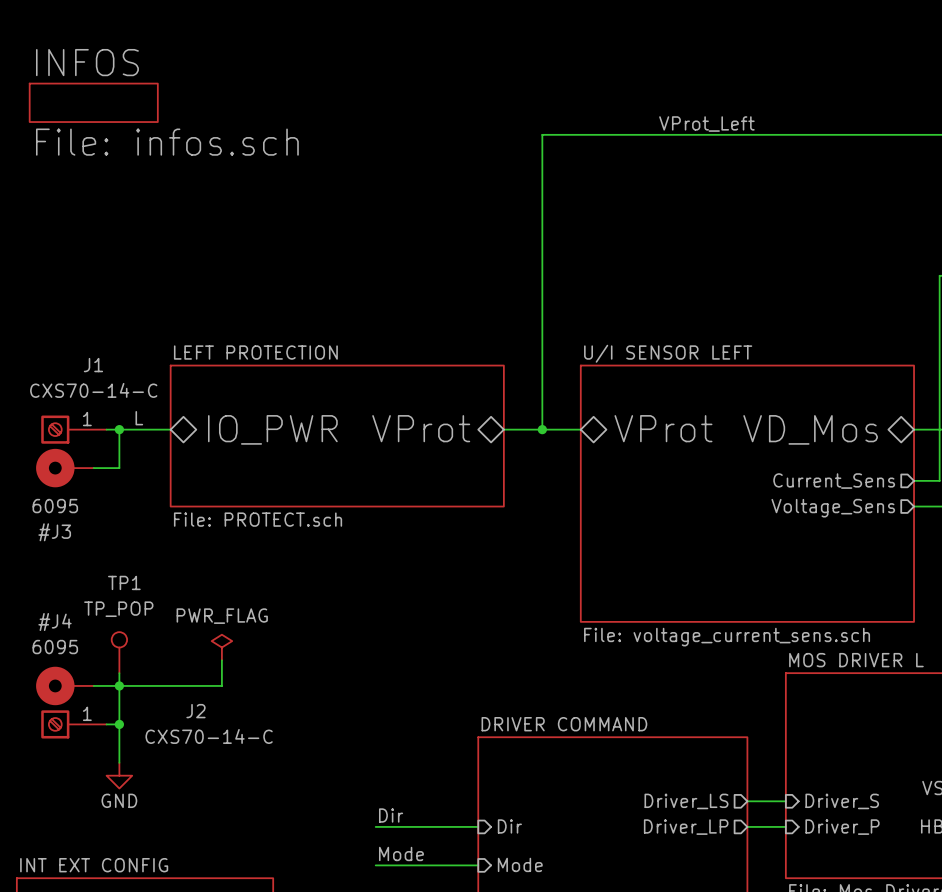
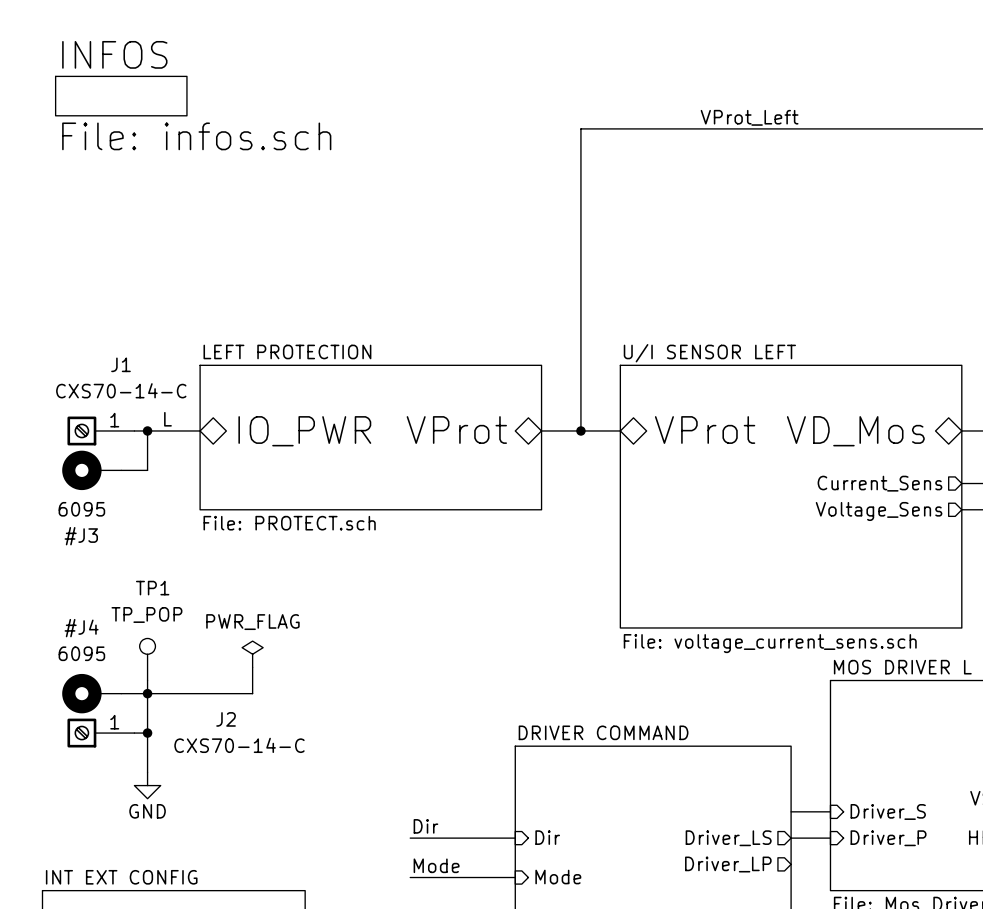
sheet pin: Driver_LS (686, 801) -> none
sheet pin: Driver_LP (686, 827) -> Driver_LS (728, 838)
sheet pin: none -> Driver_LP (728, 864)

